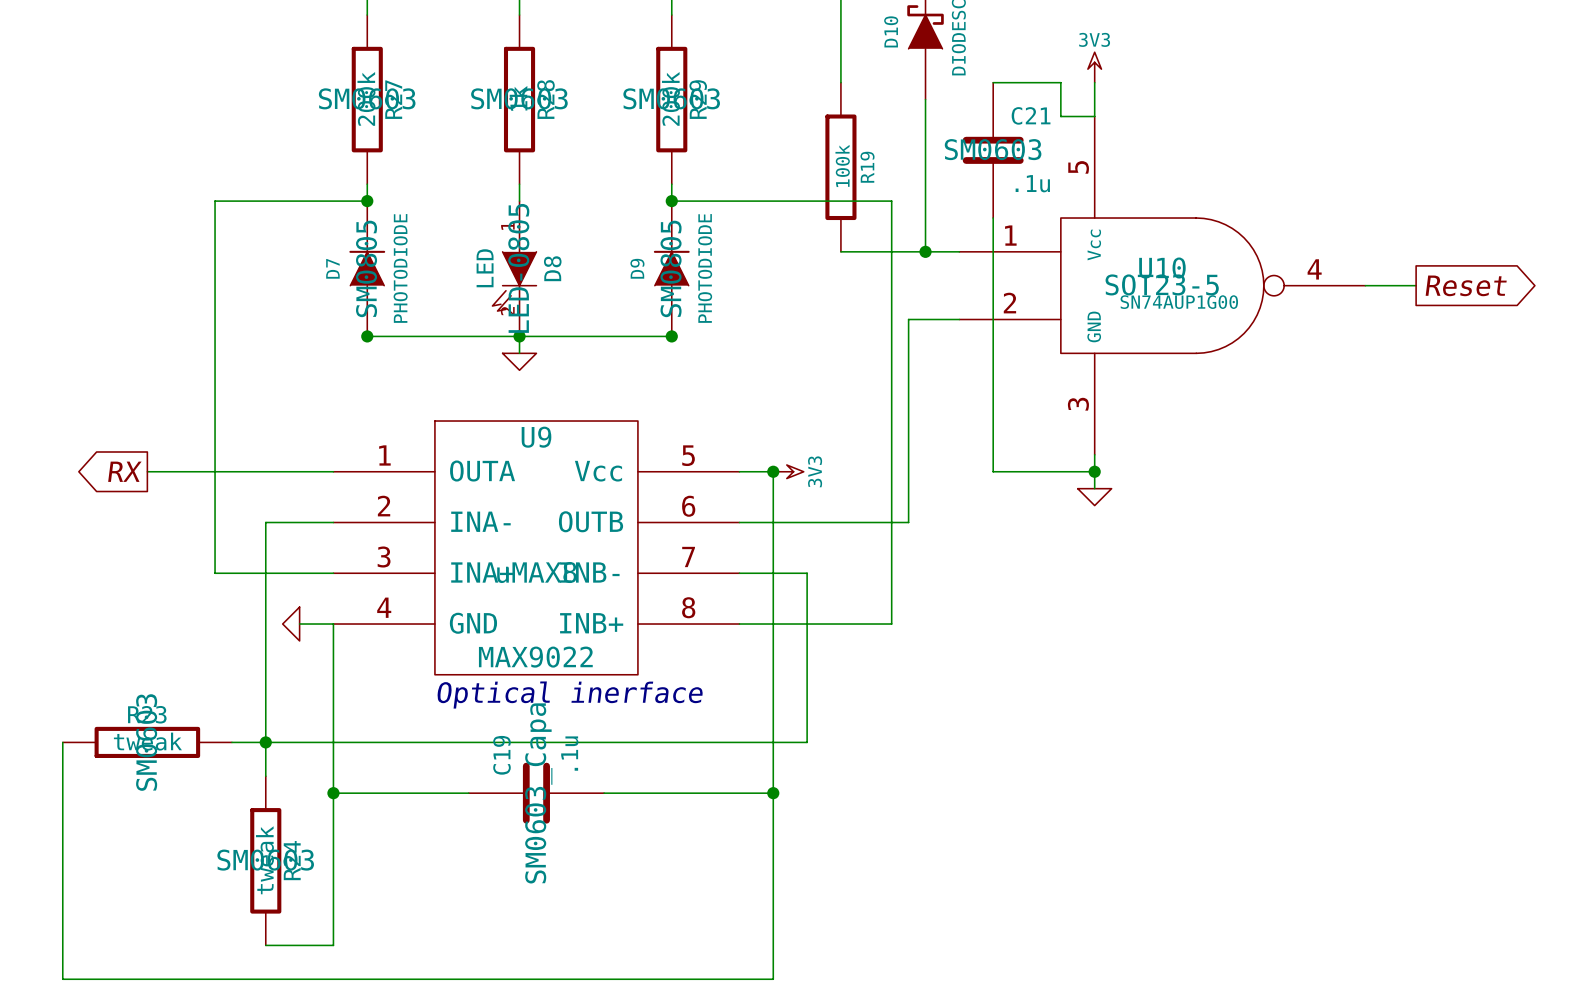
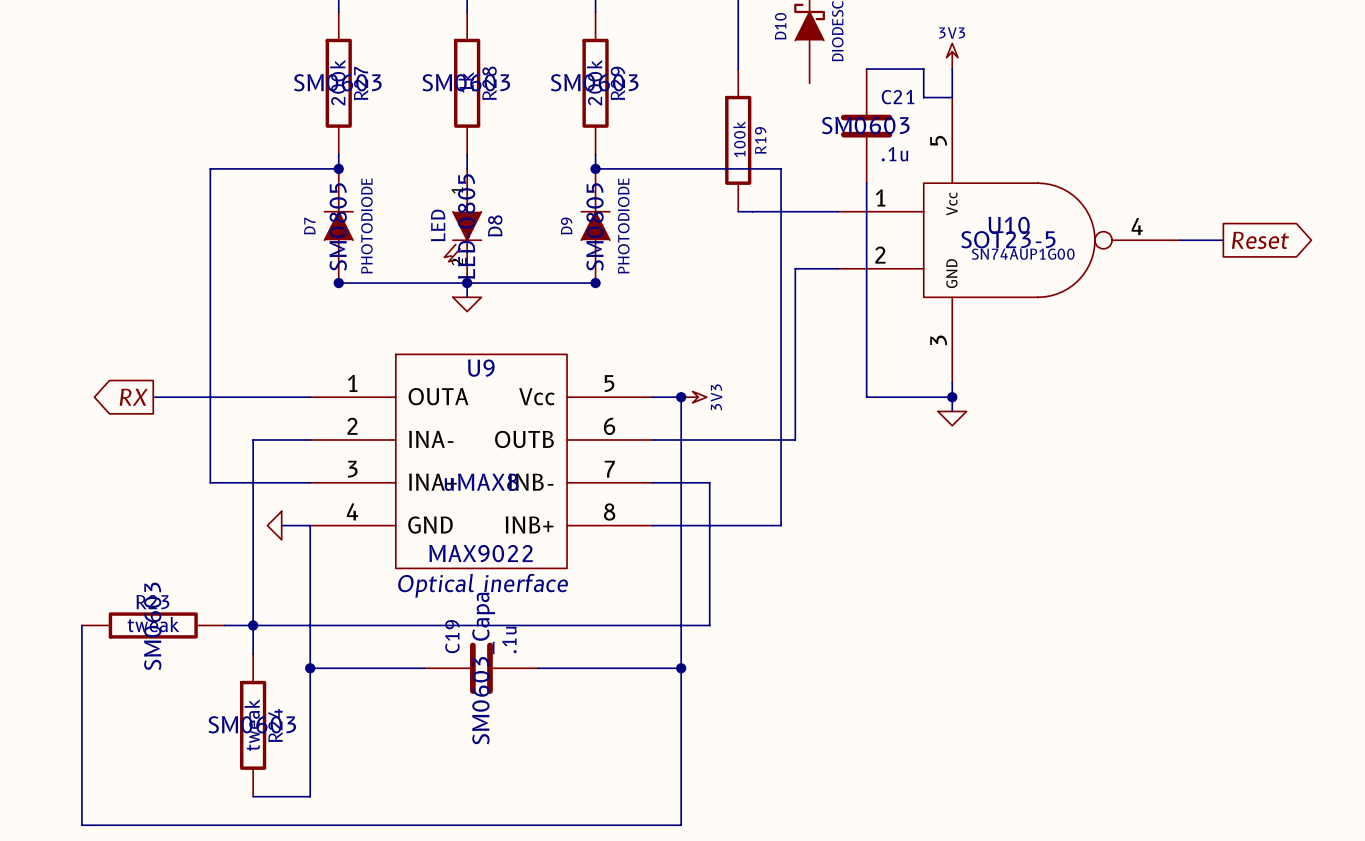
wire: (925, 99) (925, 251) -> none
junction: (925, 251) -> none

